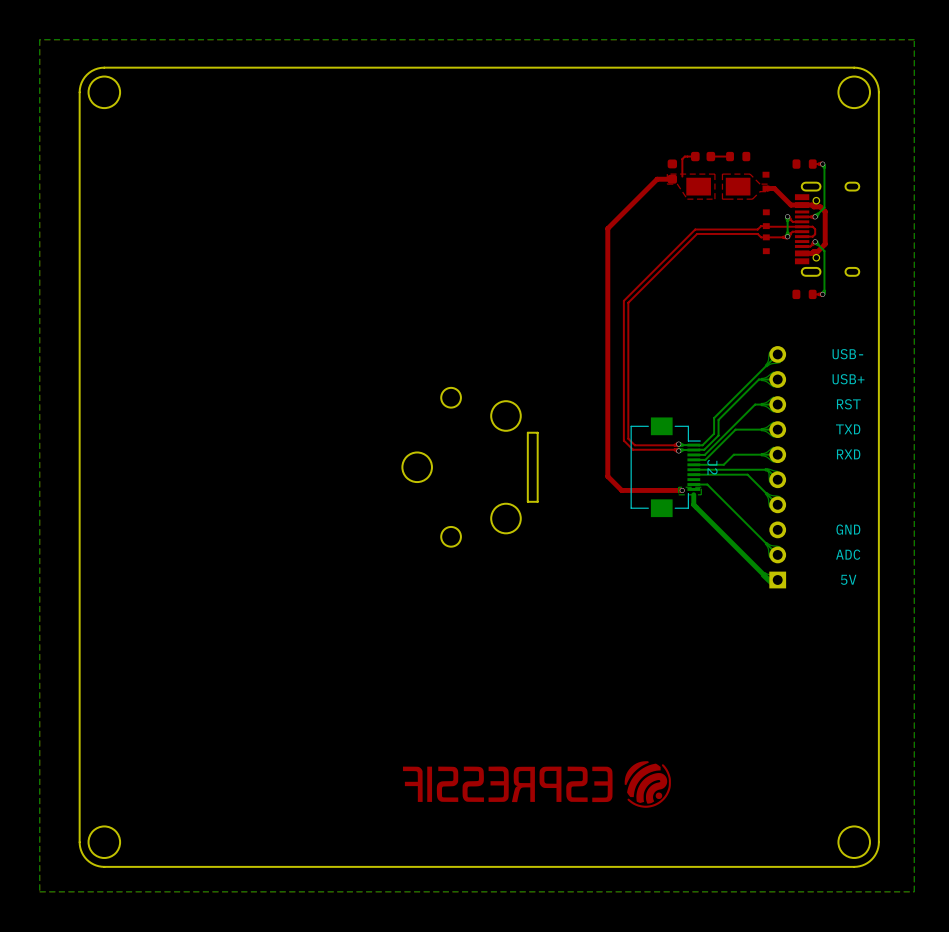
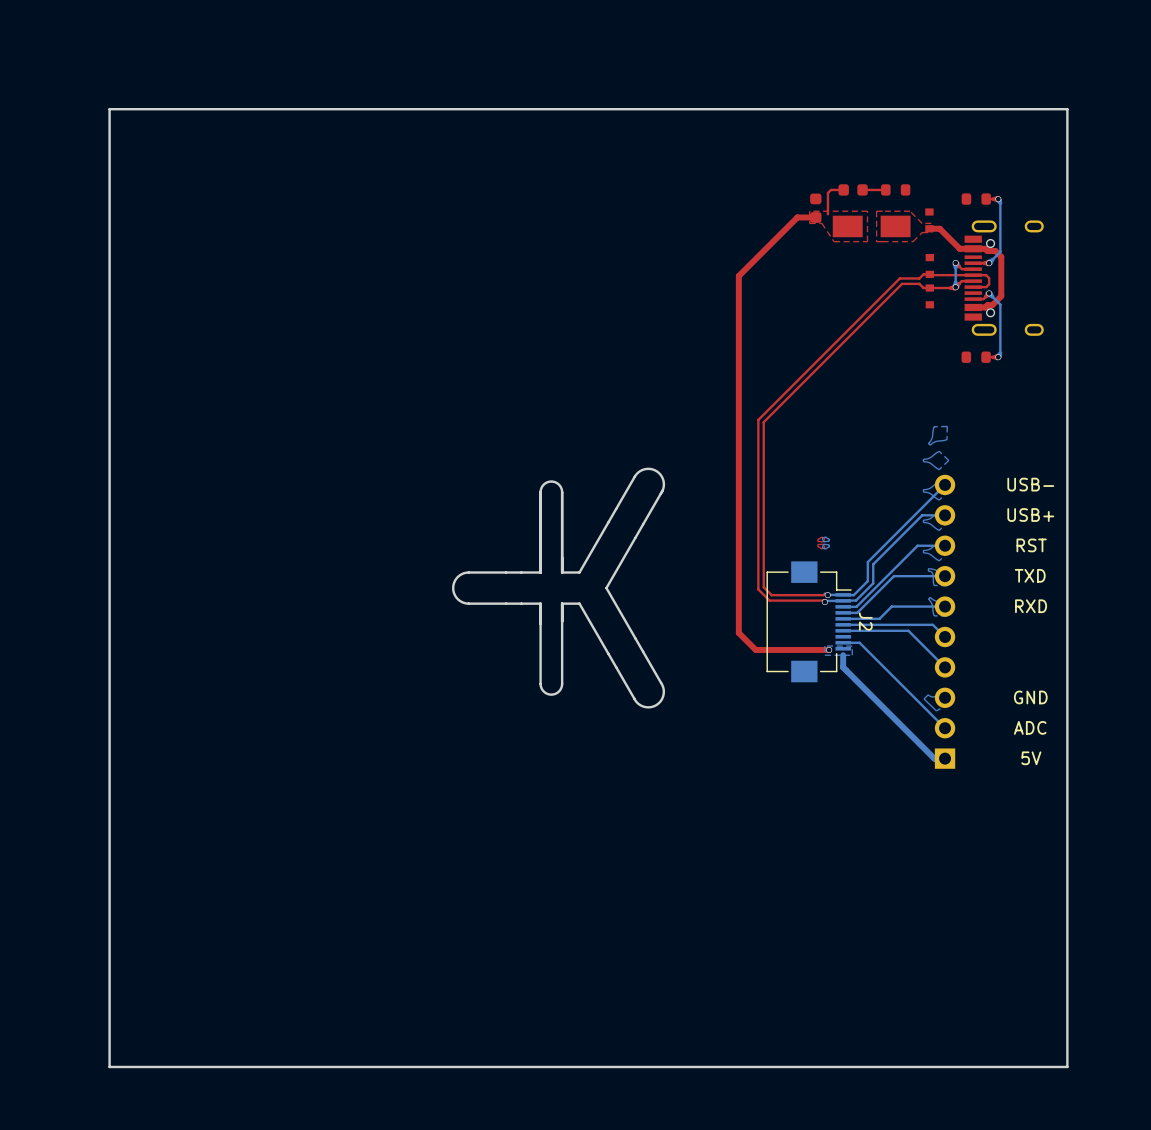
bottom zone outline: (914, 39) (914, 891) (39, 891) (39, 39) (914, 39) -> none
board edge: (854, 67) (104, 67) (94, 69) (86, 74) (81, 82) (79, 92) (79, 842) (81, 850) (86, 859) (96, 865) (104, 866) (854, 866) (862, 865) (871, 859) (877, 850) (878, 842) (878, 92) (877, 82) (871, 74) (863, 69) (854, 67) -> (1067, 109) (1067, 1066) (109, 1066) (109, 109) (1067, 109)
round board edge: [87, 75, 122, 110] -> none
round board edge: [837, 75, 871, 110] -> none
top track: (608, 227) (607, 476) (621, 490) (682, 490) -> (738, 276) (738, 633) (755, 649) (829, 649)
top track: (741, 229) (695, 229) (623, 300) (623, 440) (633, 449) (678, 450) -> (899, 278) (758, 419) (758, 589) (769, 600) (824, 602)
top track: (743, 233) (697, 233) (628, 302) (628, 438) (634, 445) (678, 444) -> (902, 283) (763, 422) (763, 587) (771, 595) (824, 593)
bottom track: (777, 354) (714, 418) (714, 433) (702, 445) (678, 444) -> (945, 484) (867, 562) (867, 581) (853, 595) (824, 593)
text position: USB- (847, 354) -> USB- (1030, 484)
bottom track: (777, 379) (758, 379) (718, 419) (718, 435) (704, 449) (678, 450) -> (945, 515) (922, 515) (873, 564) (873, 583) (856, 600) (824, 602)
text position: USB+ (848, 379) -> USB+ (1030, 515)
round board edge: [440, 386, 462, 409] -> none
round board edge: [490, 400, 522, 432] -> none
board edge: none -> (662, 490) (606, 588) (662, 684) (663, 692) (661, 699) (650, 707) (642, 706) (636, 701) (579, 603) (562, 603) (562, 685) (556, 693) (545, 693) (540, 683) (540, 603) (465, 603) (454, 595) (453, 588) (454, 580) (459, 575) (466, 572) (540, 572) (540, 491) (542, 486) (547, 482) (557, 483) (562, 491) (562, 572) (579, 572) (638, 472) (649, 468) (658, 472) (663, 482) (660, 493)
bottom track: (777, 404) (755, 404) (704, 454) (693, 454) -> (945, 545) (917, 545) (856, 606) (843, 606)
text position: RST (848, 404) -> RST (1031, 545)
bottom track: (777, 429) (735, 429) (705, 459) (693, 459) -> (945, 576) (893, 576) (857, 612) (843, 612)
text position: TXD (848, 429) -> TXD (1030, 575)
board edge: (537, 432) (527, 432) (527, 501) (537, 501) (537, 432) -> none
via: (678, 444) -> none
via: (678, 450) -> none
round board edge: [401, 451, 433, 484] -> none
bottom track: (777, 454) (733, 454) (723, 464) (693, 464) -> (945, 606) (891, 606) (879, 618) (843, 618)
text position: RXD (848, 454) -> RXD (1031, 606)
J2 position: (665, 467) -> (809, 621)
part position: (777, 467) -> (945, 621)
bottom track: (693, 469) (767, 469) (777, 479) -> (843, 624) (932, 624) (945, 636)
bottom track: (693, 474) (747, 474) (777, 504) -> (843, 630) (908, 630) (945, 667)
bottom track: (693, 484) (707, 484) (777, 554) -> (843, 642) (859, 642) (945, 728)
bottom zone outline: (701, 487) (701, 494) (678, 494) (678, 487) (701, 487) -> (852, 646) (852, 655) (824, 655) (824, 646) (852, 646)
bottom track: (693, 494) (693, 504) (768, 580) (777, 580) -> (843, 655) (843, 667) (934, 758) (945, 758)
via: none -> (824, 602)
round board edge: [490, 502, 522, 535] -> none
round board edge: [440, 525, 462, 548] -> none
text position: GND (848, 529) -> GND (1030, 697)
via: none -> (829, 649)
bottom zone outline: (766, 542) (780, 547) (780, 557) (769, 557) (765, 543) (766, 542) -> none
text position: ADC (848, 554) -> ADC (1030, 727)
text position: 5V (848, 579) -> 5V (1031, 758)
drawing: [402, 761, 671, 808] -> none
round board edge: [87, 825, 122, 859] -> none
round board edge: [837, 825, 871, 859] -> none

